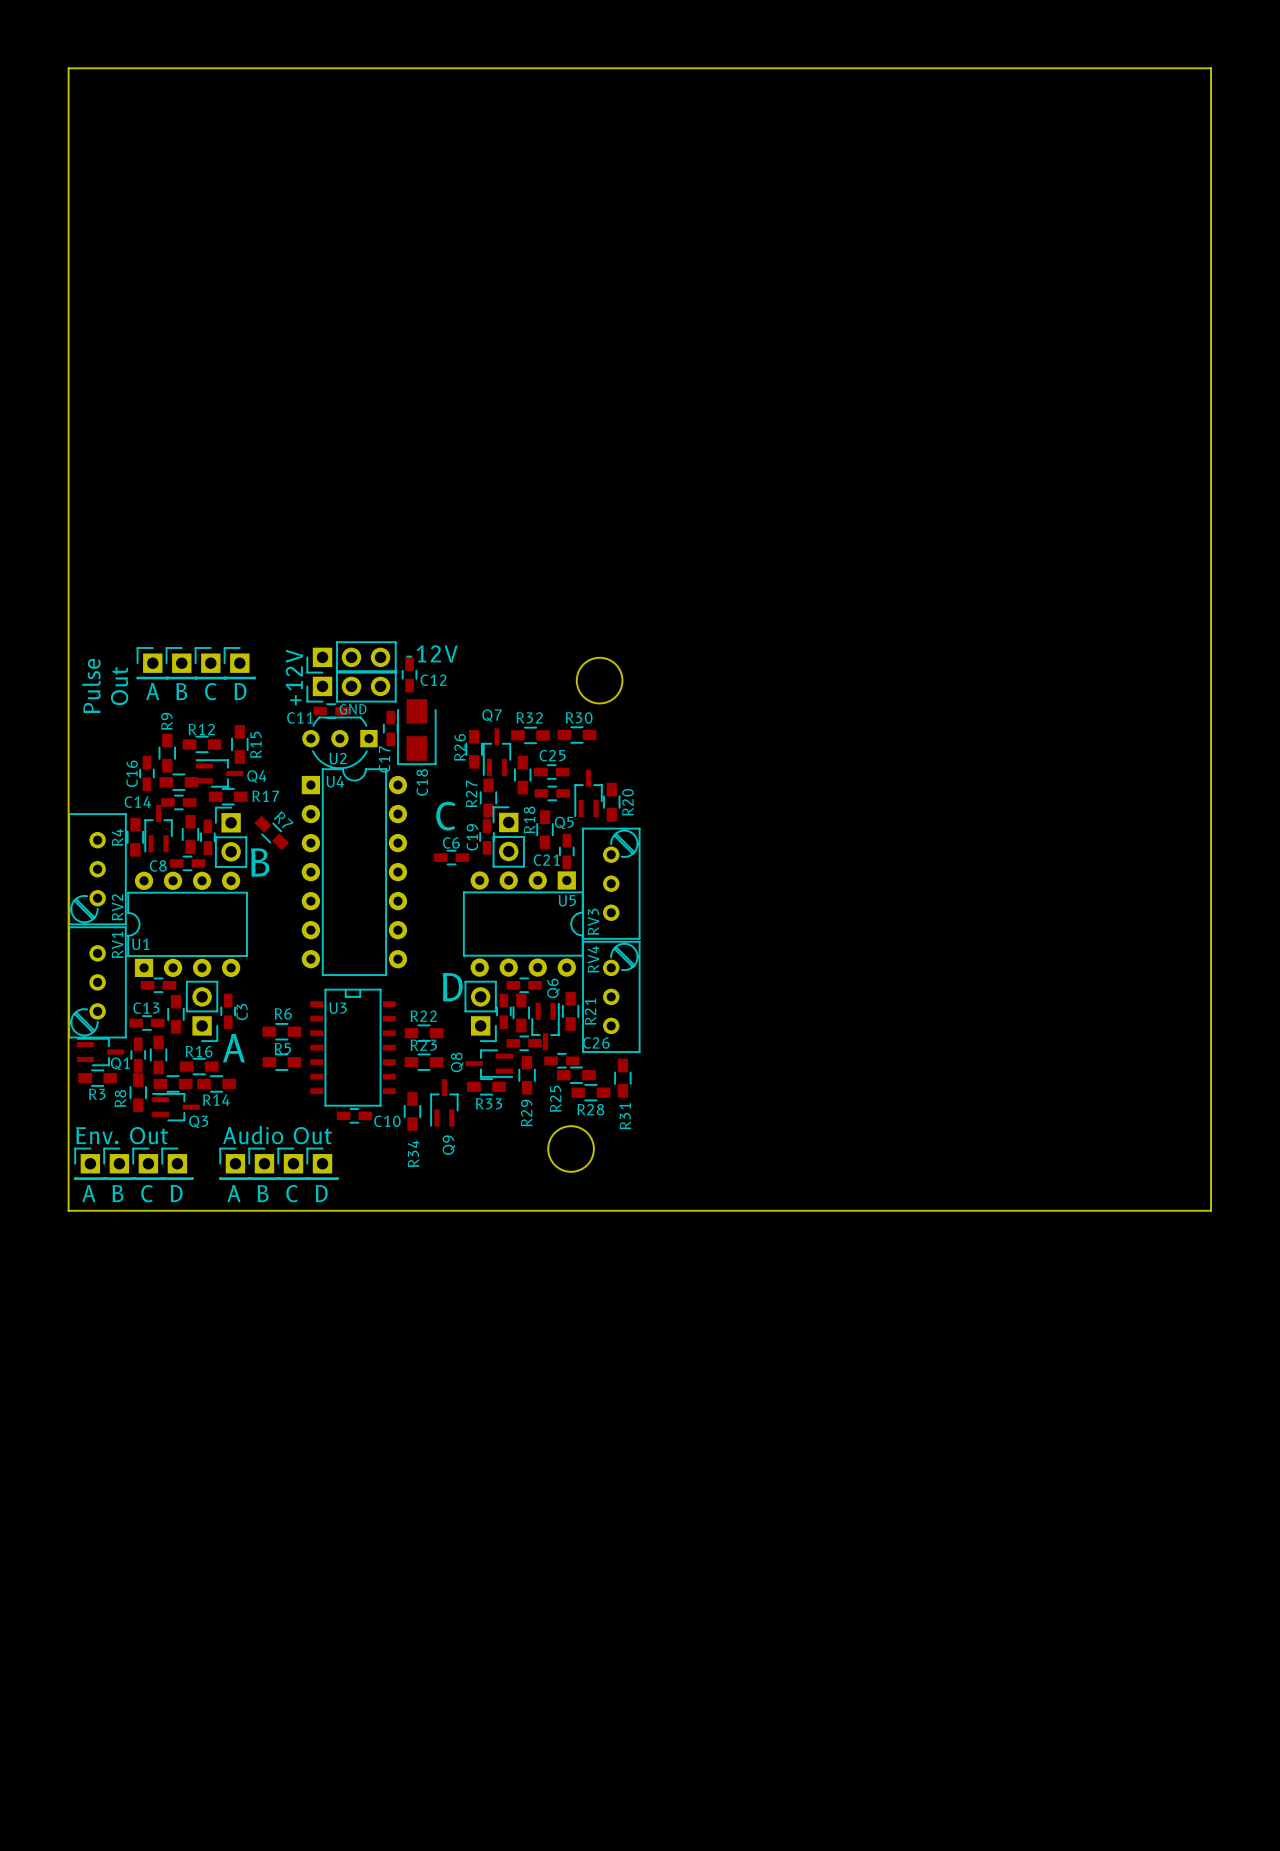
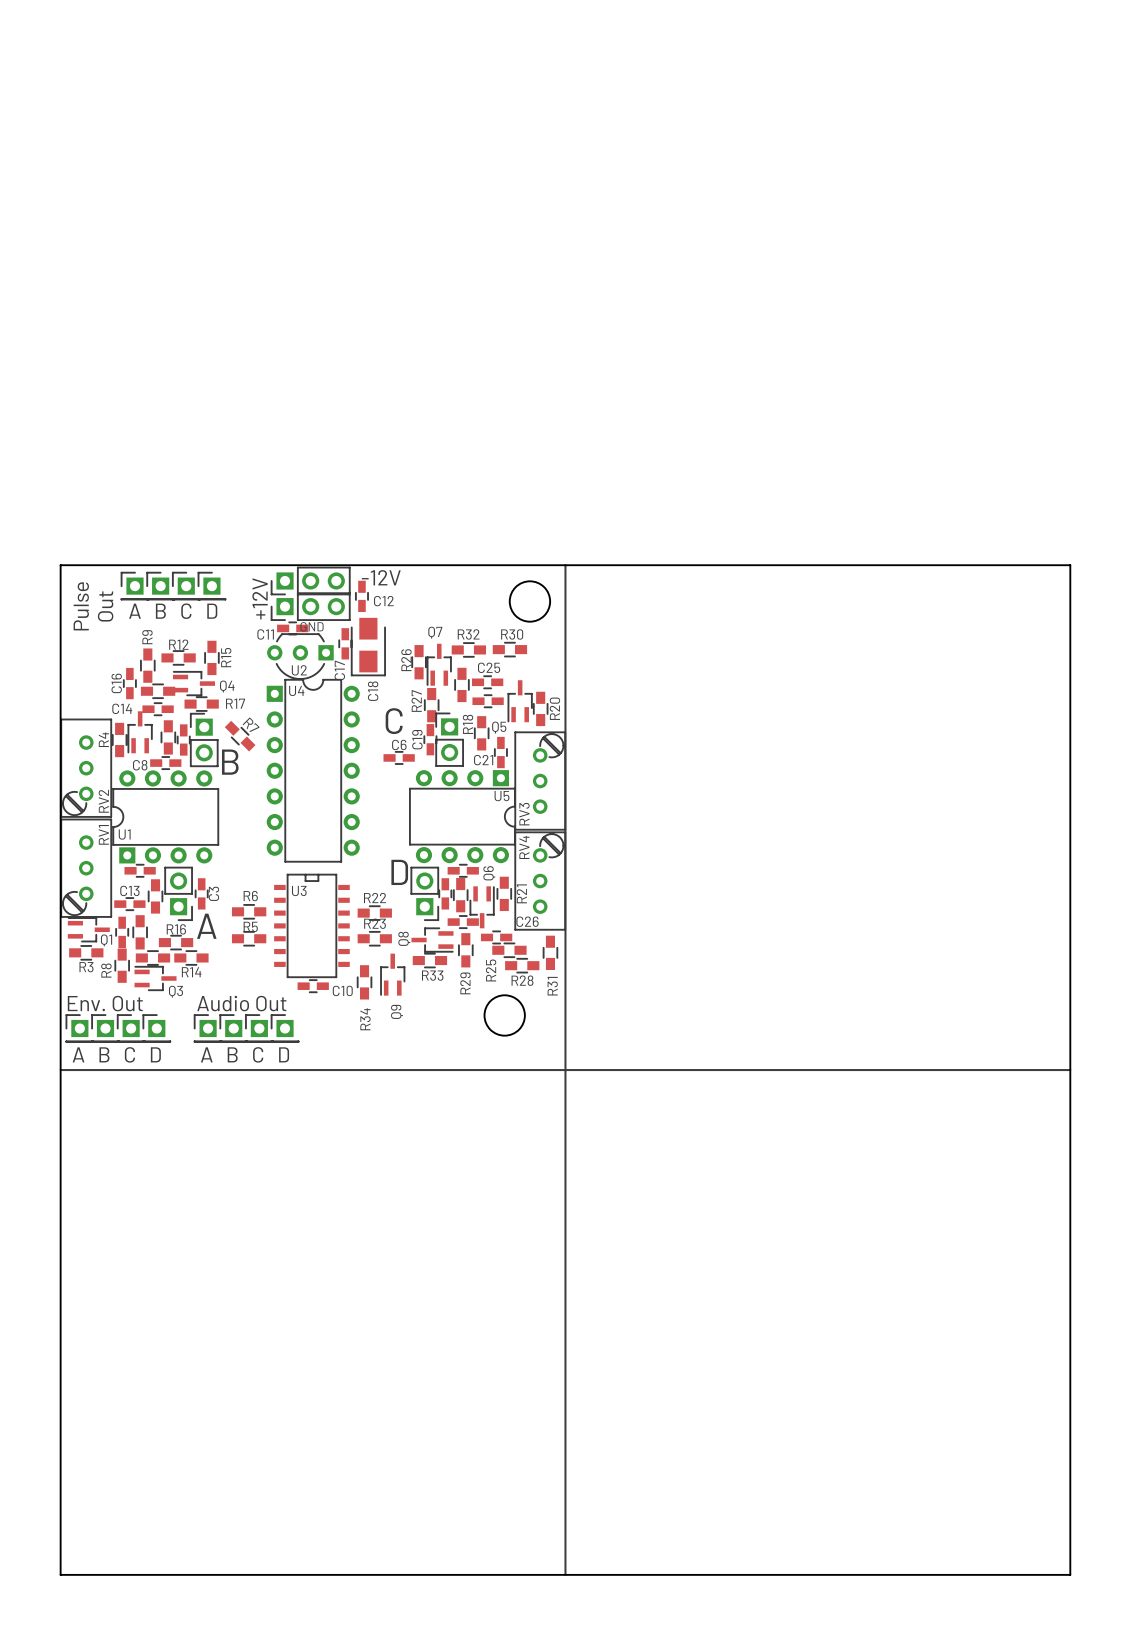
board edge: (68, 639) (68, 68) (1211, 68) (1211, 639) -> (60, 565) (1070, 565)
line: none -> (565, 565) (565, 1574)
board edge: (68, 1210) (1211, 1210) -> (60, 1070) (60, 1574) (1070, 1574) (1070, 1070)
line: none -> (60, 1070) (1070, 1070)

